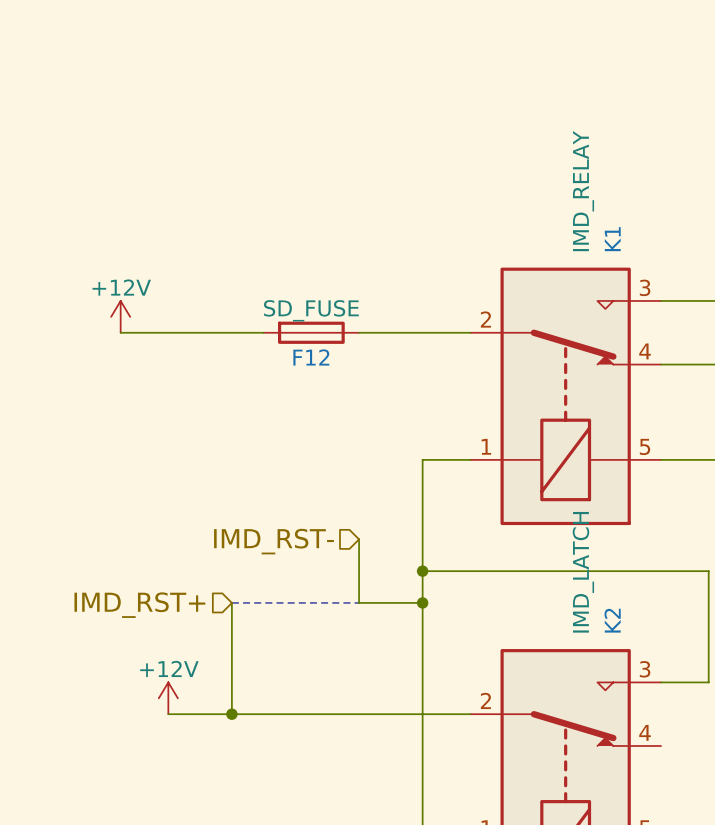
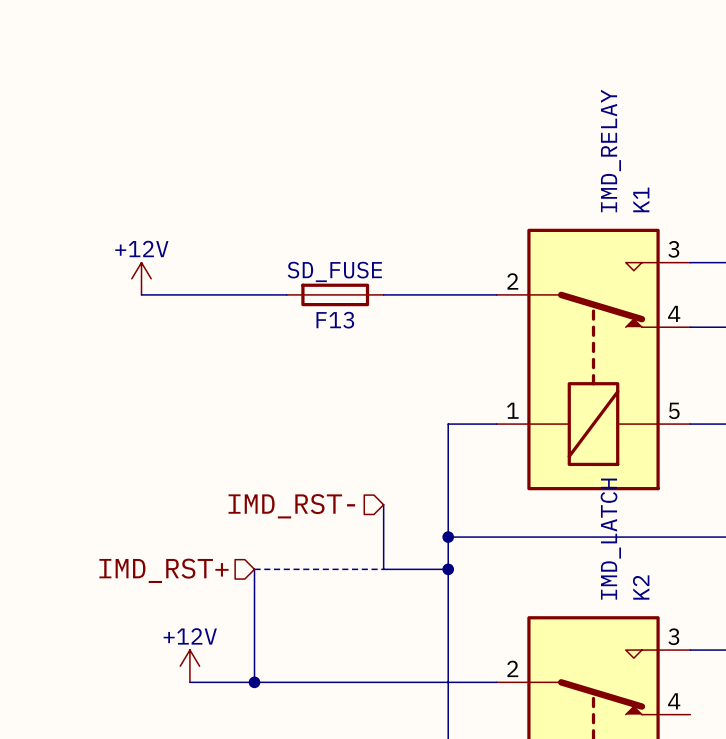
F12 name: F12 (311, 357) -> F13 (335, 320)

